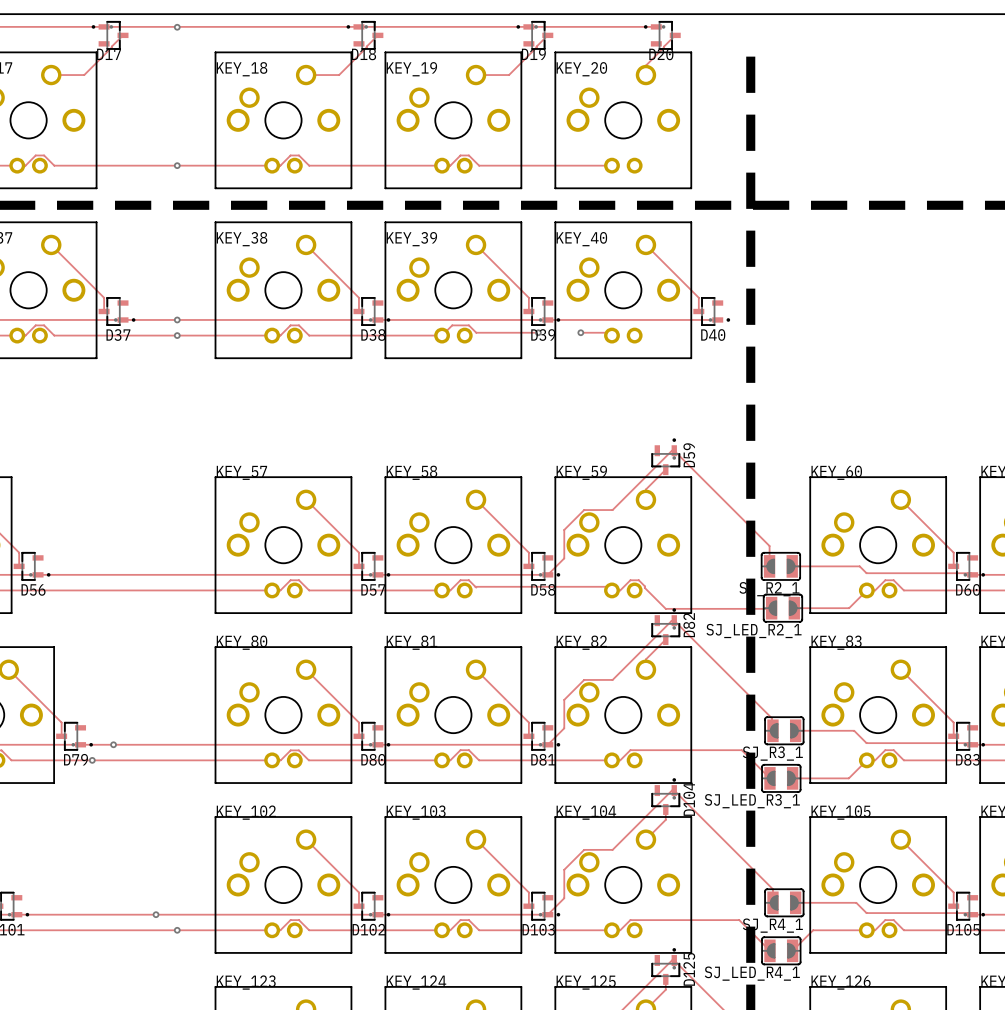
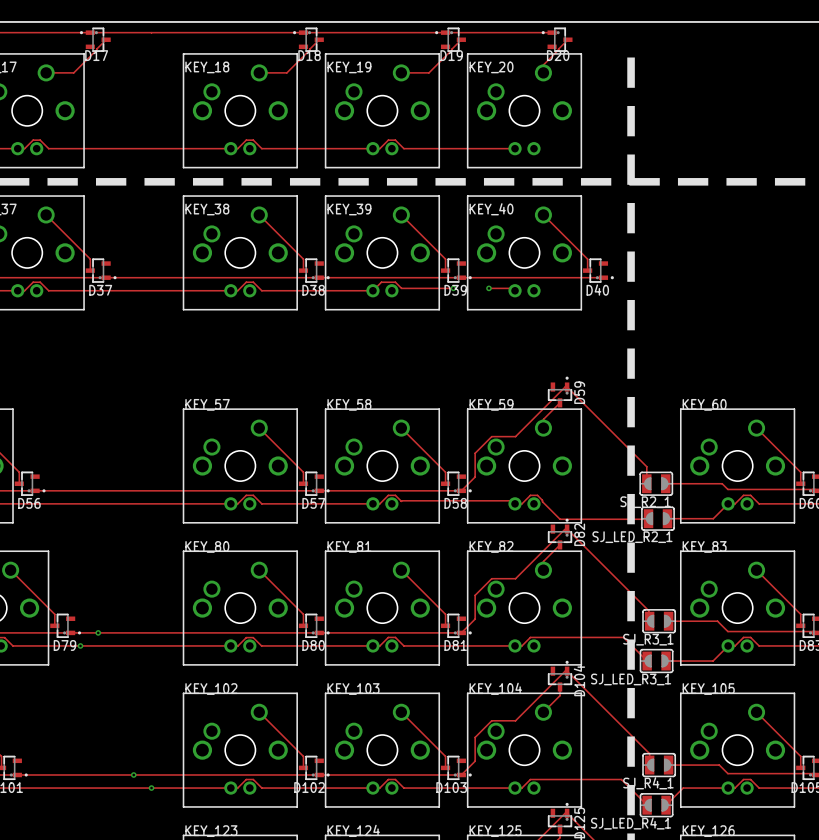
via: (177, 27) -> none
via: (177, 165) -> none
via: (177, 319) -> none
via: (177, 335) -> none

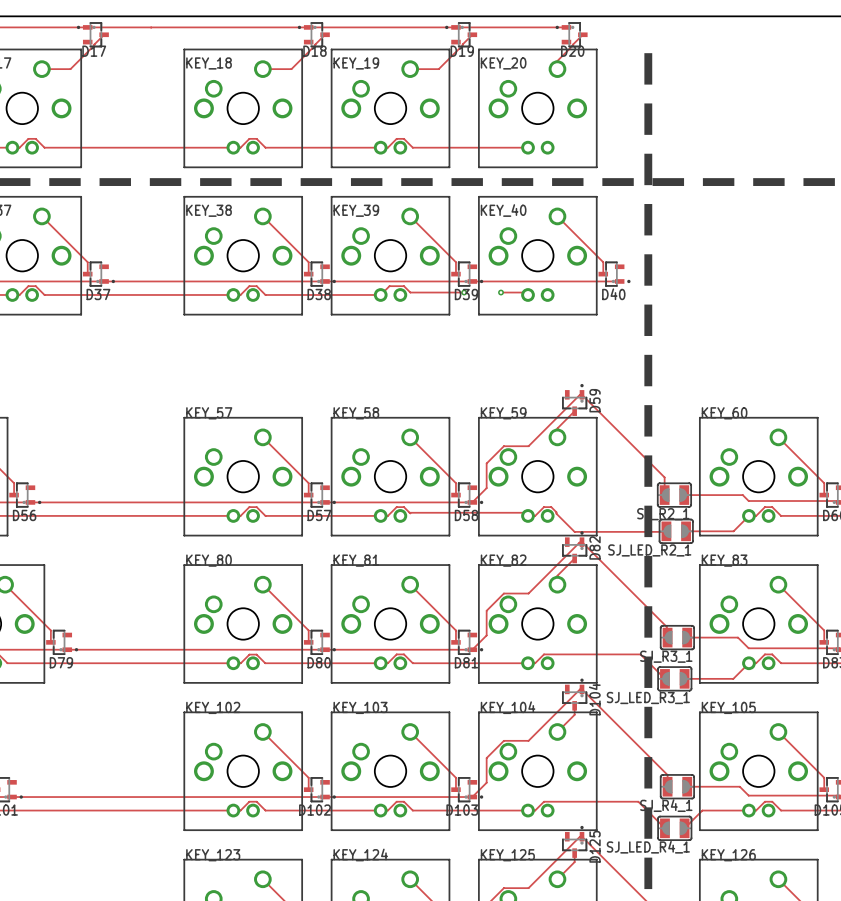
via: (98, 632) -> none
via: (80, 645) -> none
via: (133, 774) -> none
via: (151, 788) -> none

